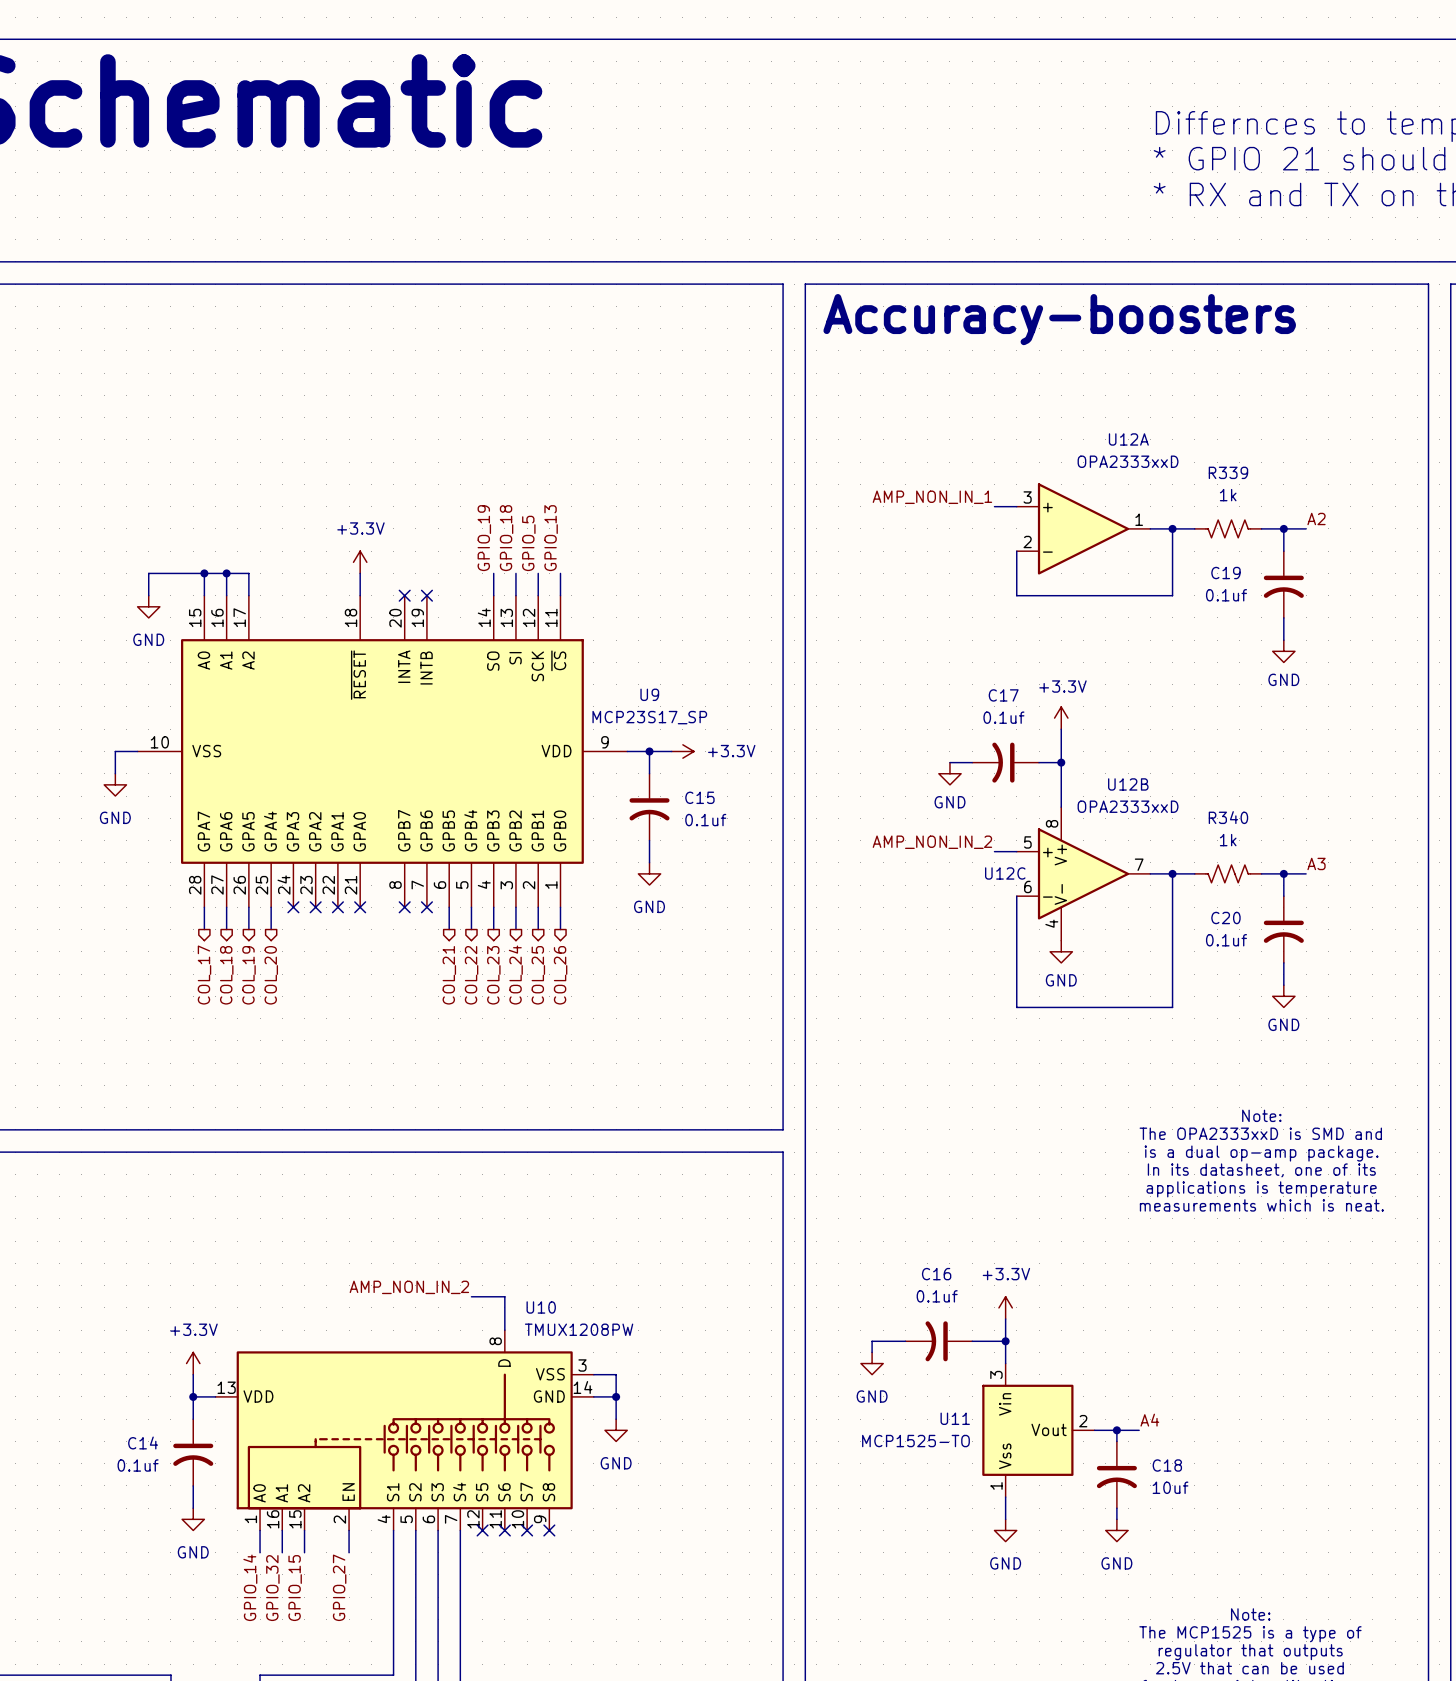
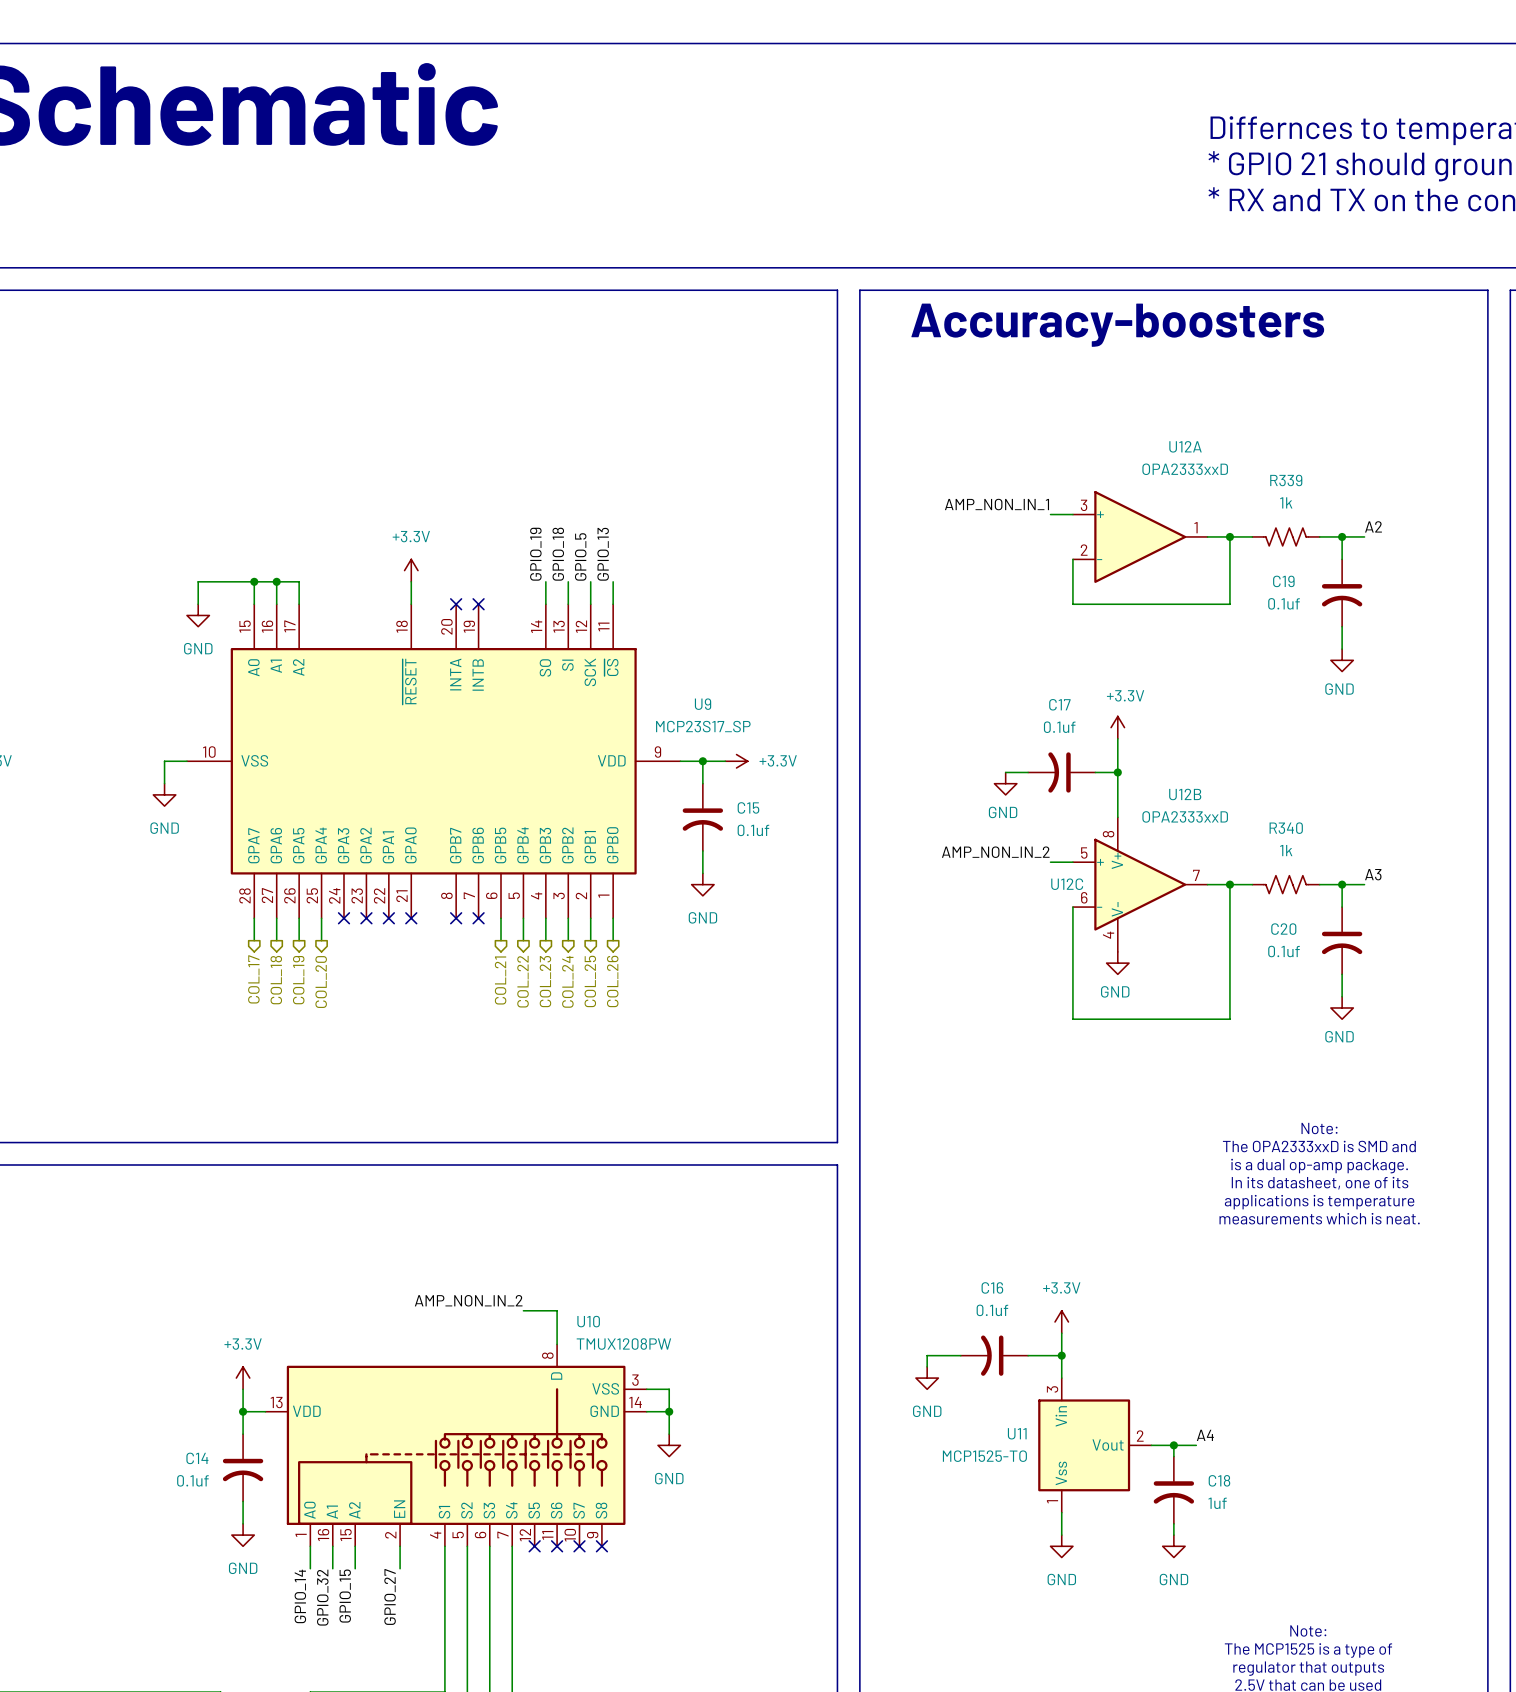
C18 value: 10uf (1170, 1487) -> 1uf (1217, 1503)

